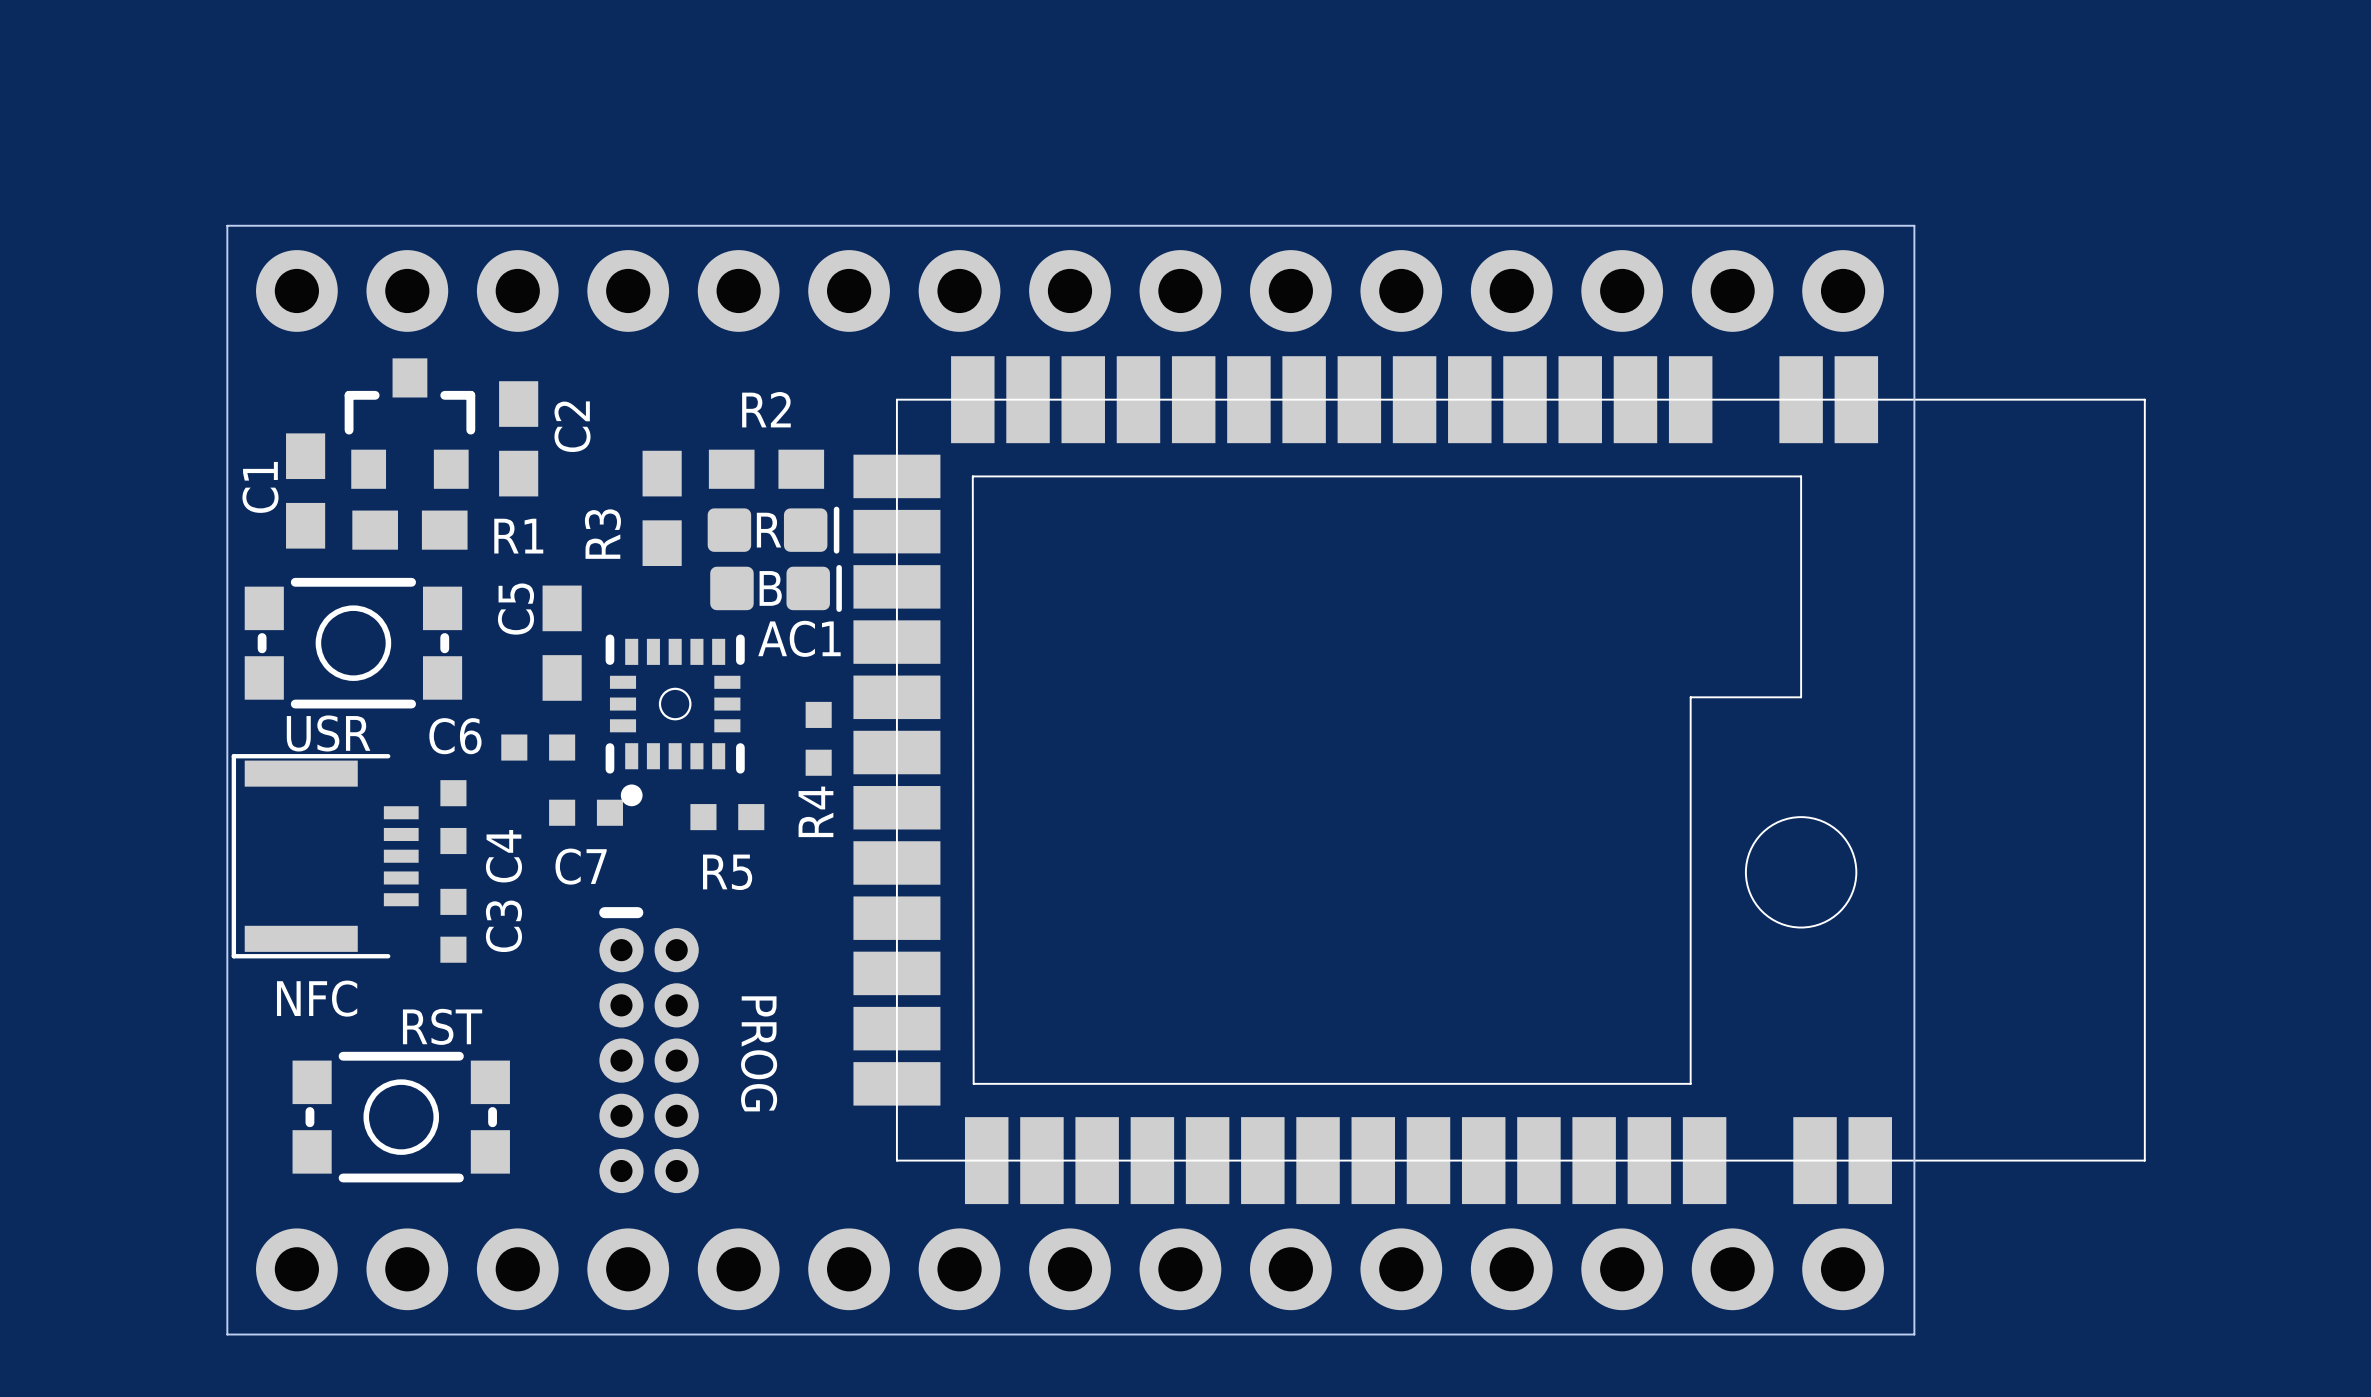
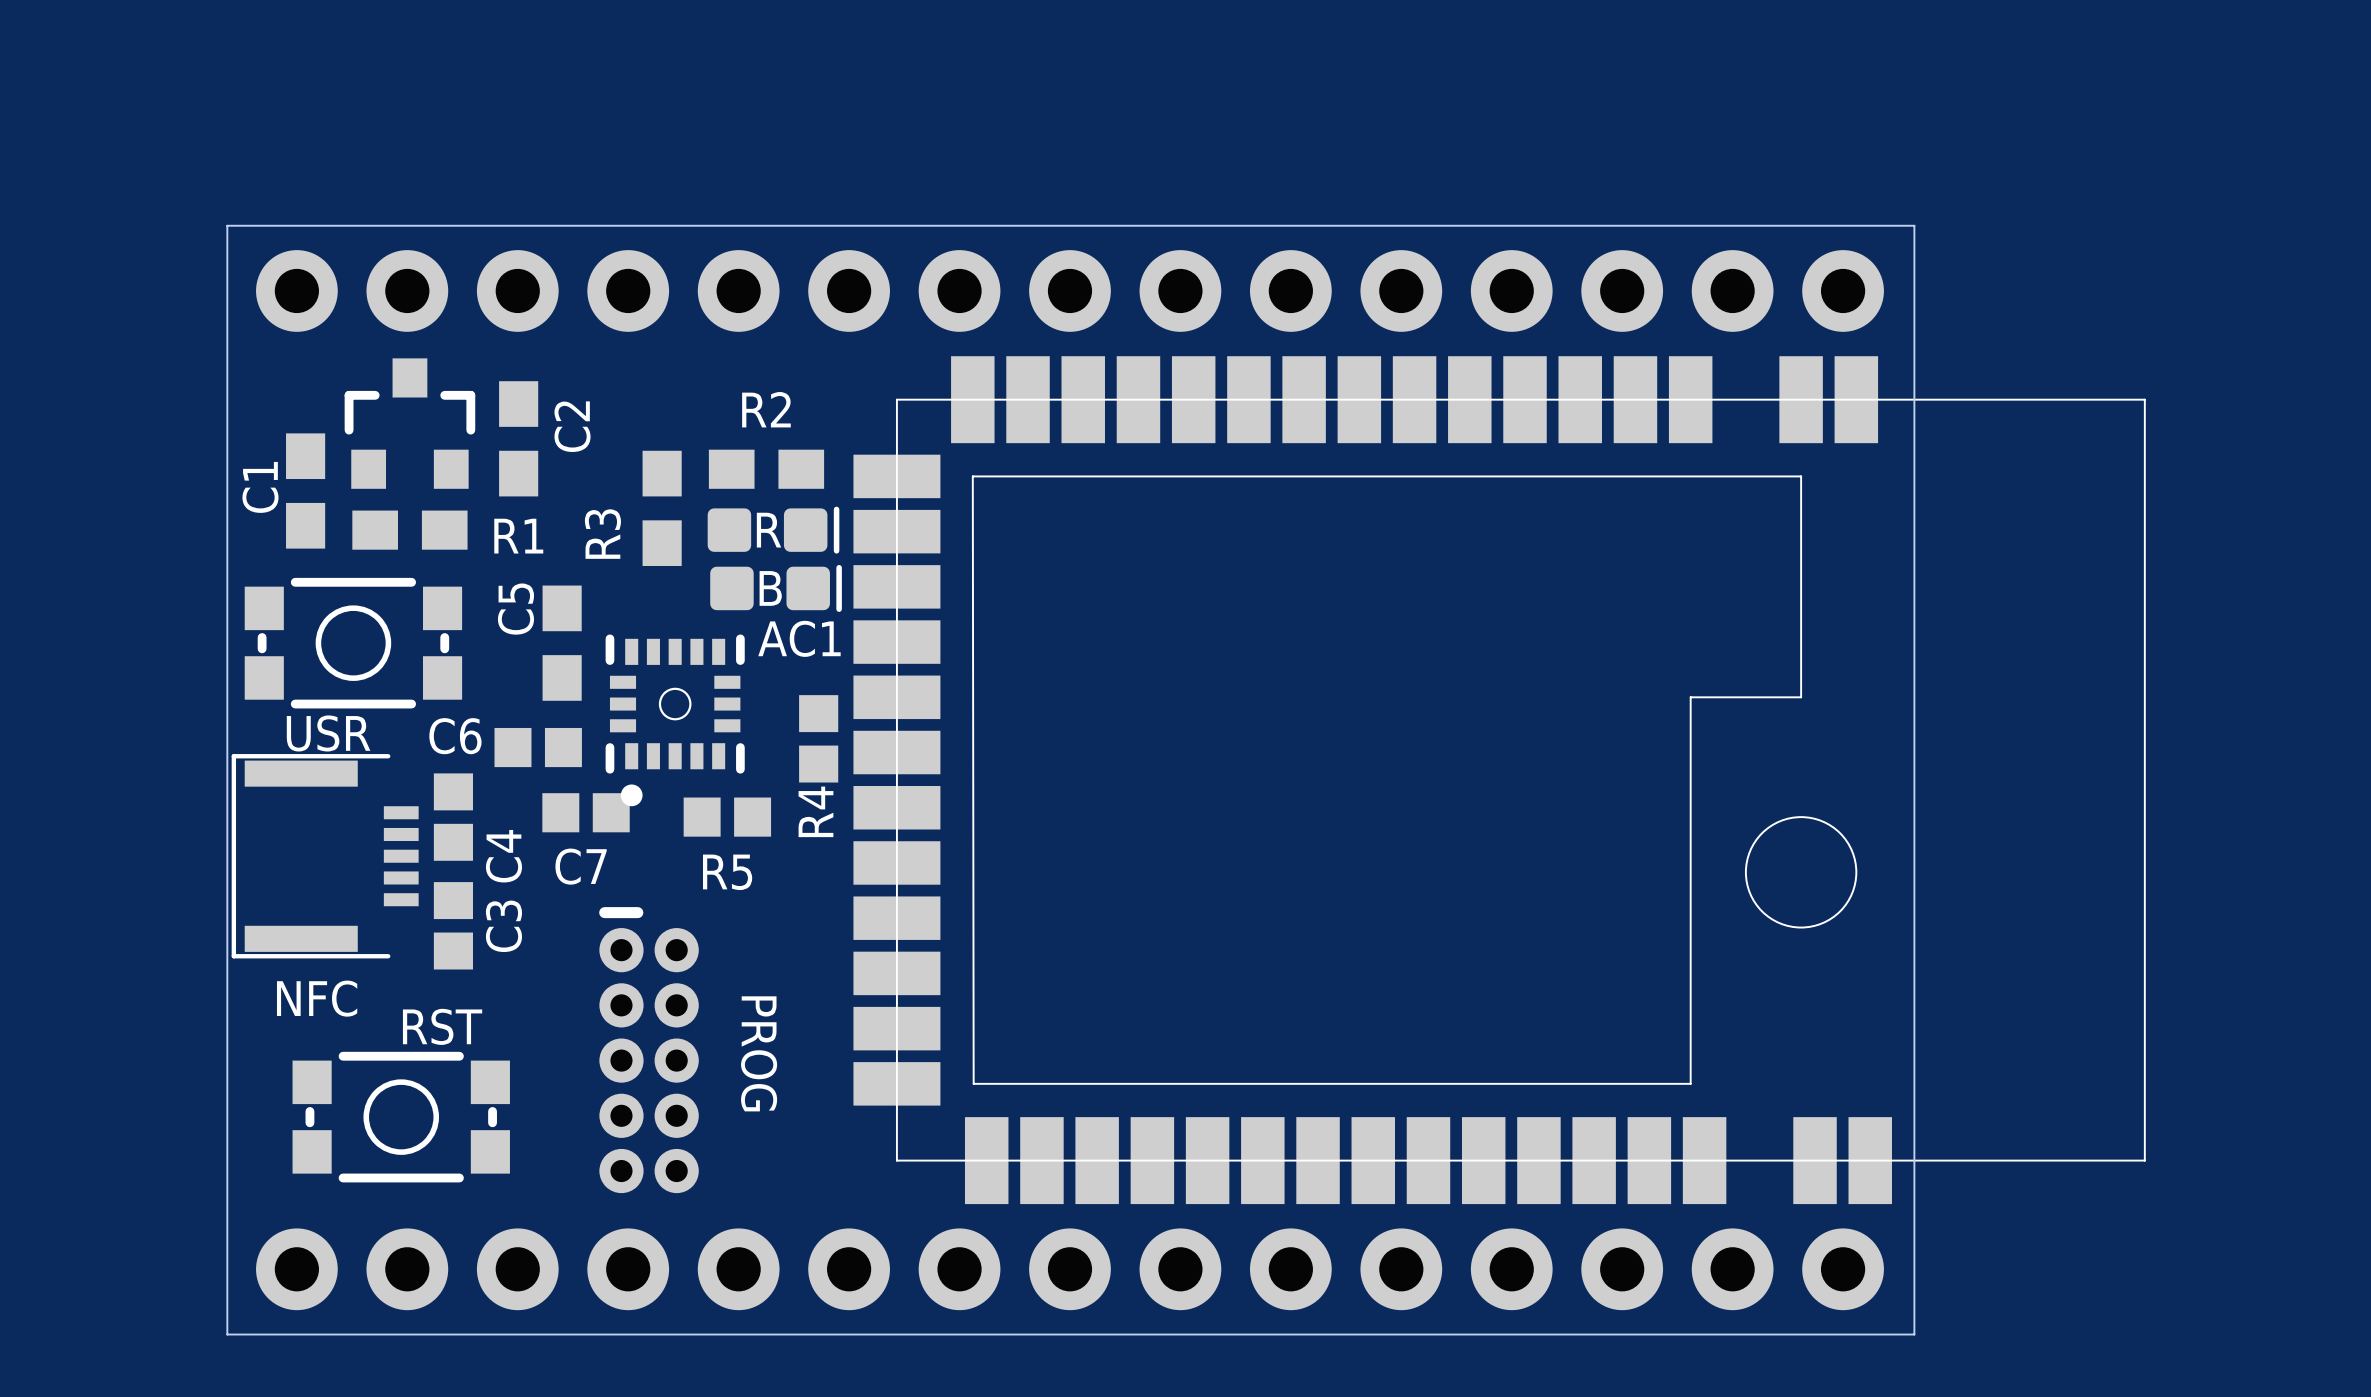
R4 footprint: [805, 701, 832, 776] -> [799, 695, 839, 783]
C6 footprint: [501, 734, 576, 761] -> [494, 727, 582, 768]
C4 footprint: [440, 780, 467, 855] -> [433, 773, 473, 861]
C7 footprint: [549, 799, 624, 826] -> [542, 793, 630, 833]
R5 footprint: [690, 804, 765, 831] -> [683, 797, 772, 837]
C3 footprint: [440, 888, 467, 963] -> [433, 882, 473, 970]

